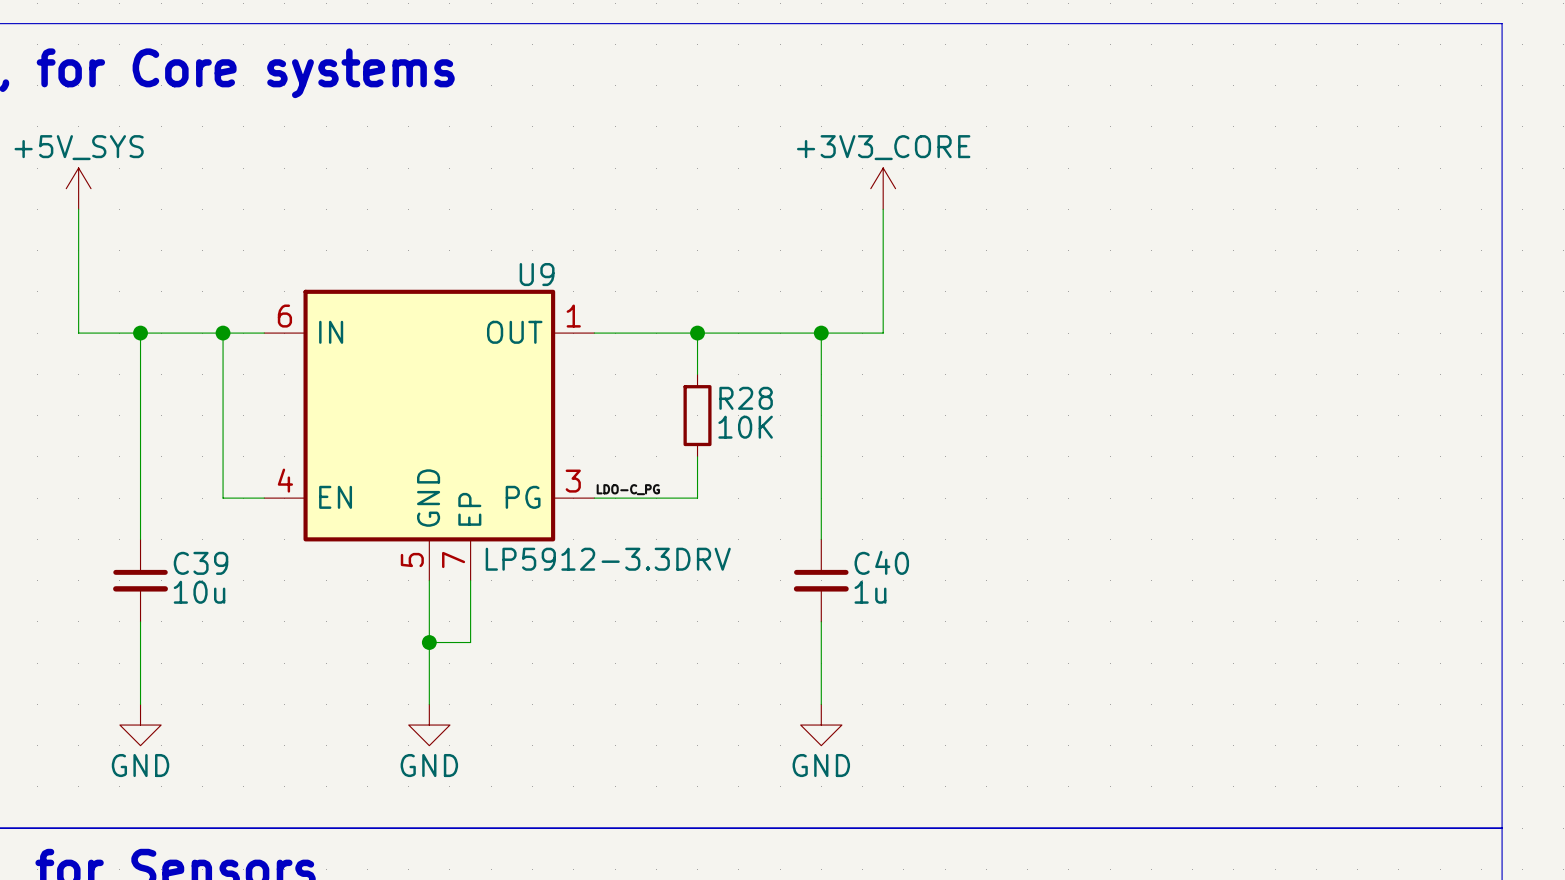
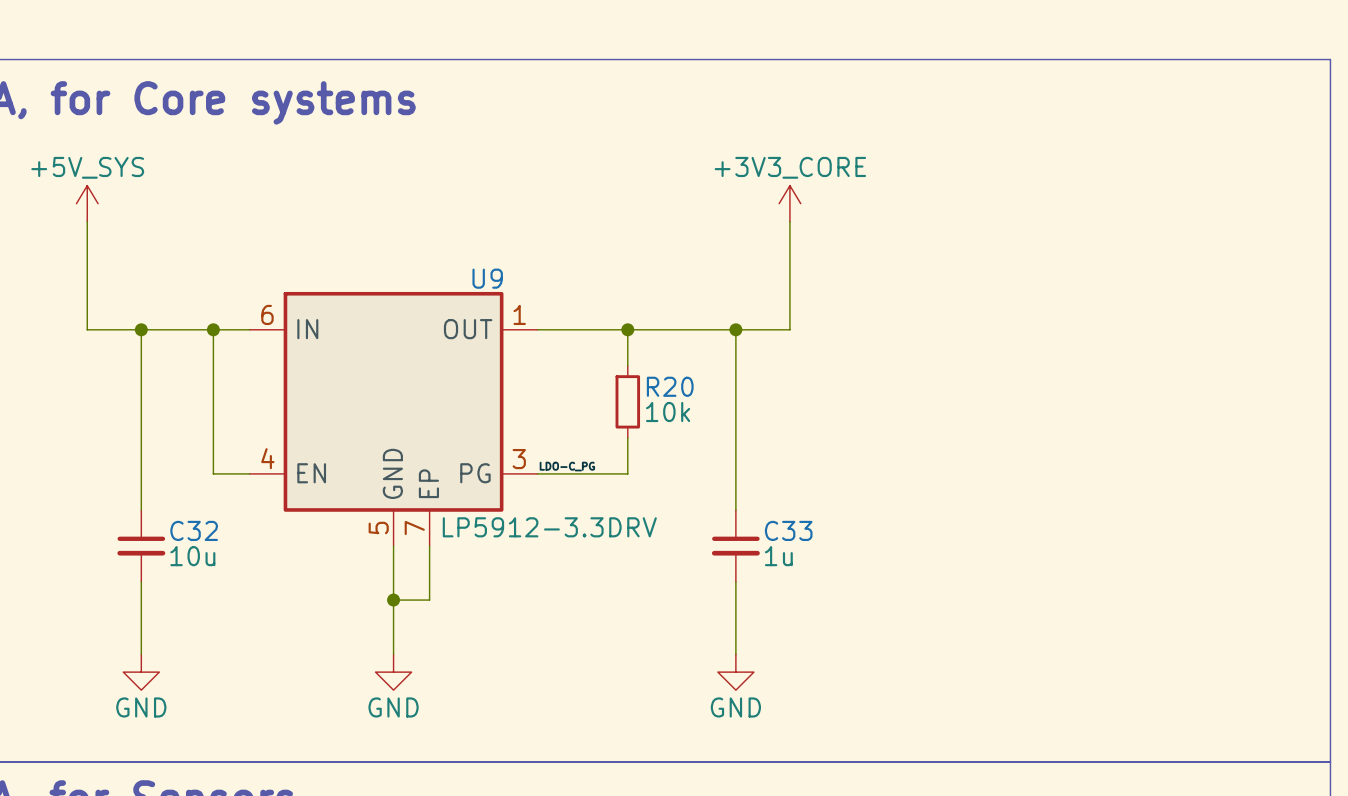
R28 name: R28 (746, 398) -> R20 (670, 386)
R28 value: 10K (745, 427) -> 10k (668, 412)
C40 name: C40 (881, 562) -> C33 (788, 530)
C39 name: C39 (200, 563) -> C32 (194, 530)

